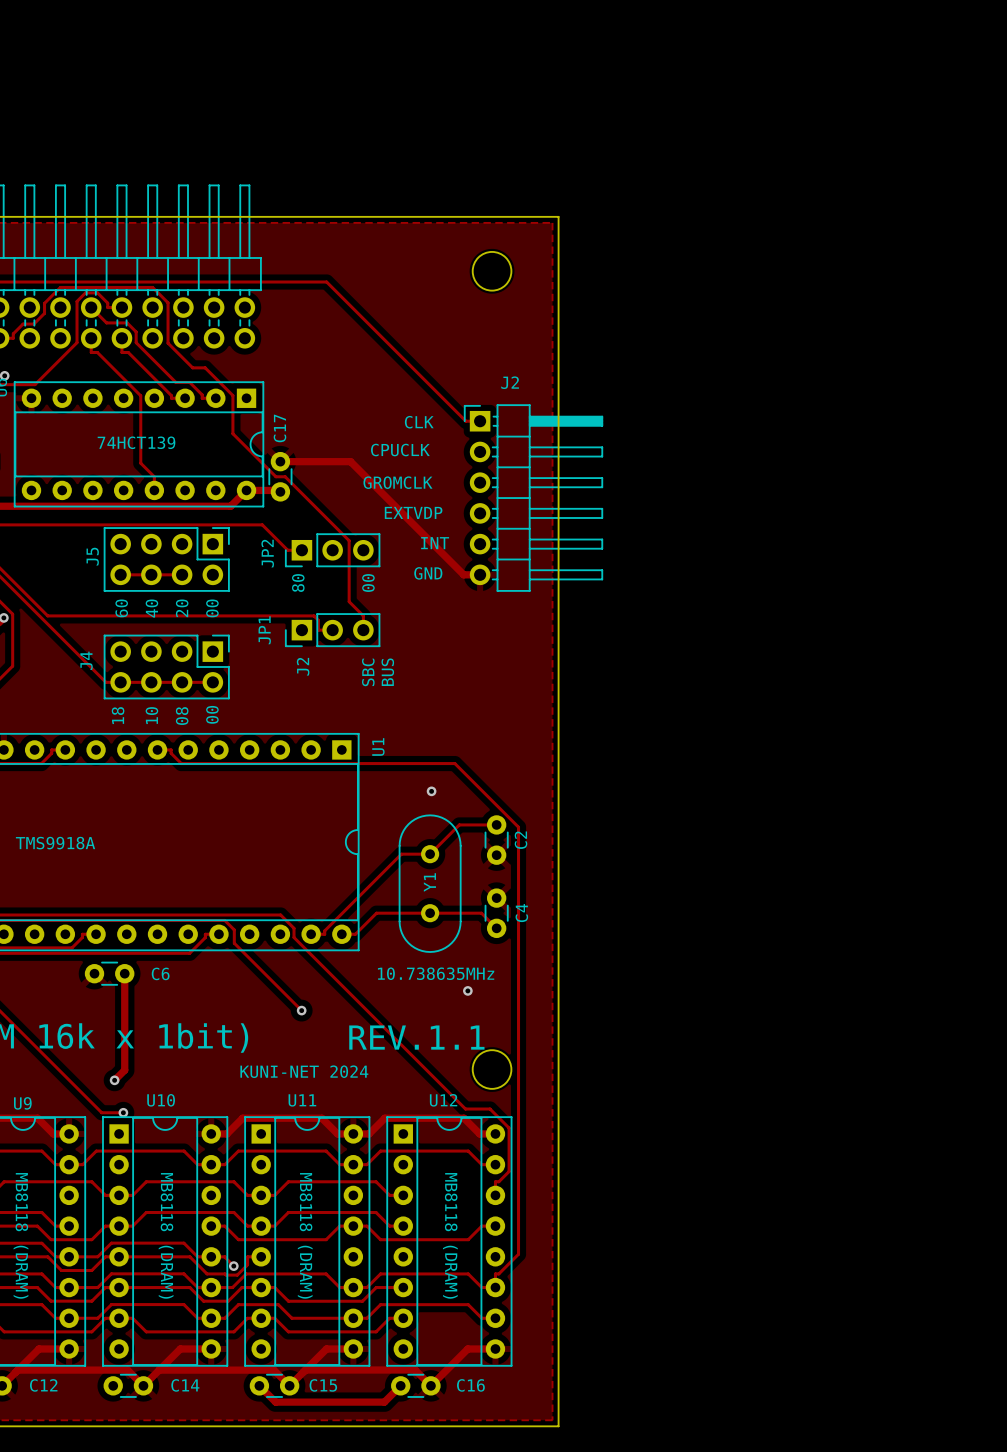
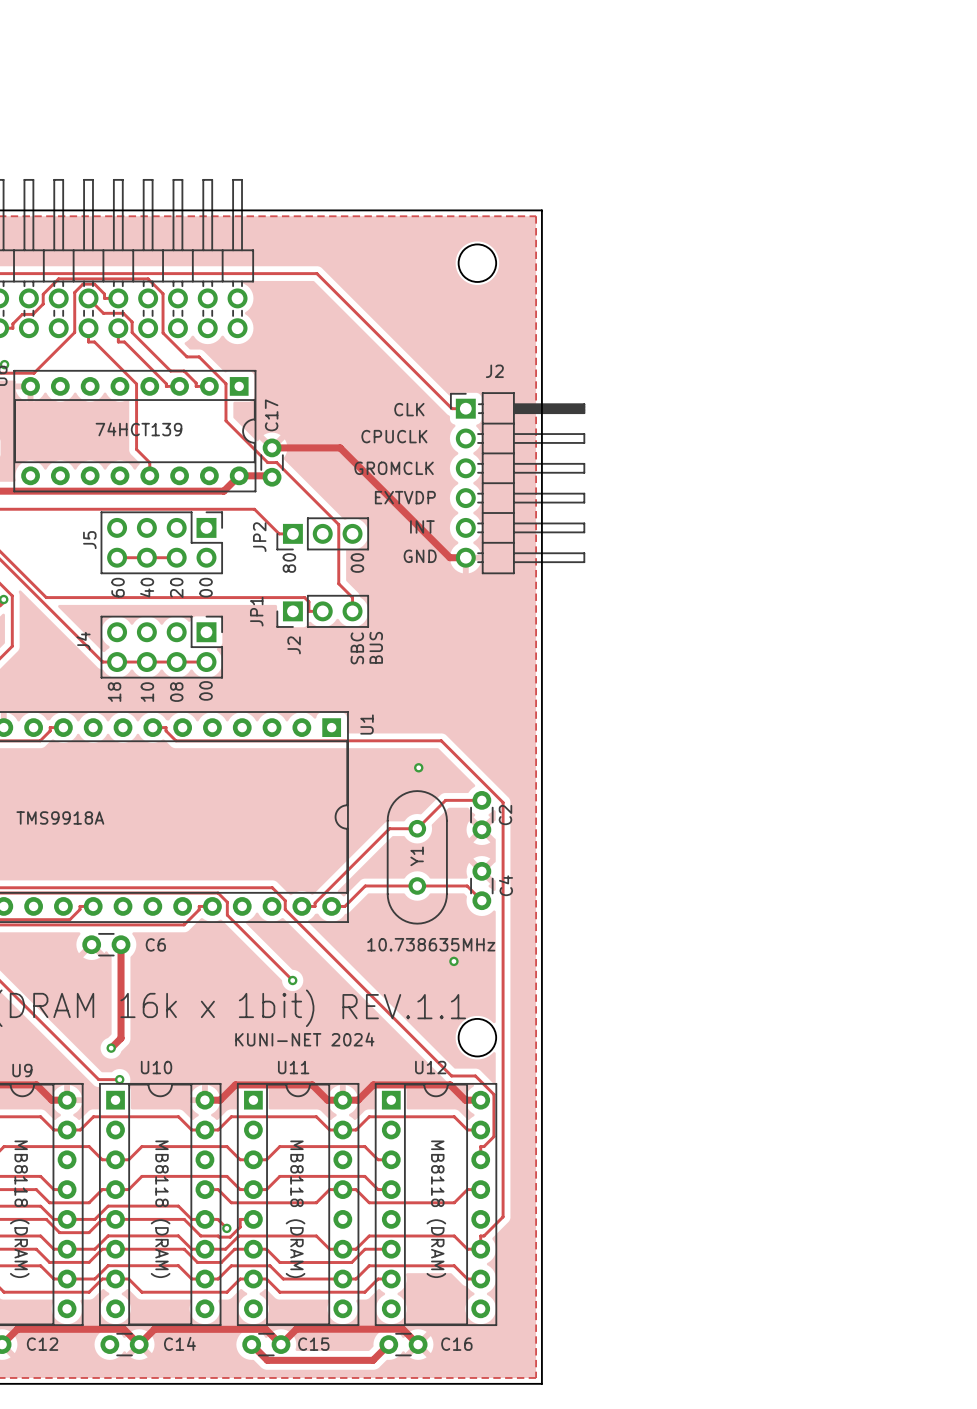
track: (69, 1348) (39, 1348) (17, 1370) -> none
track: (211, 1348) (180, 1348) (159, 1370) -> none
track: (353, 1348) (326, 1348) (305, 1370) -> none
track: (495, 1348) (467, 1348) (430, 1385) -> none

